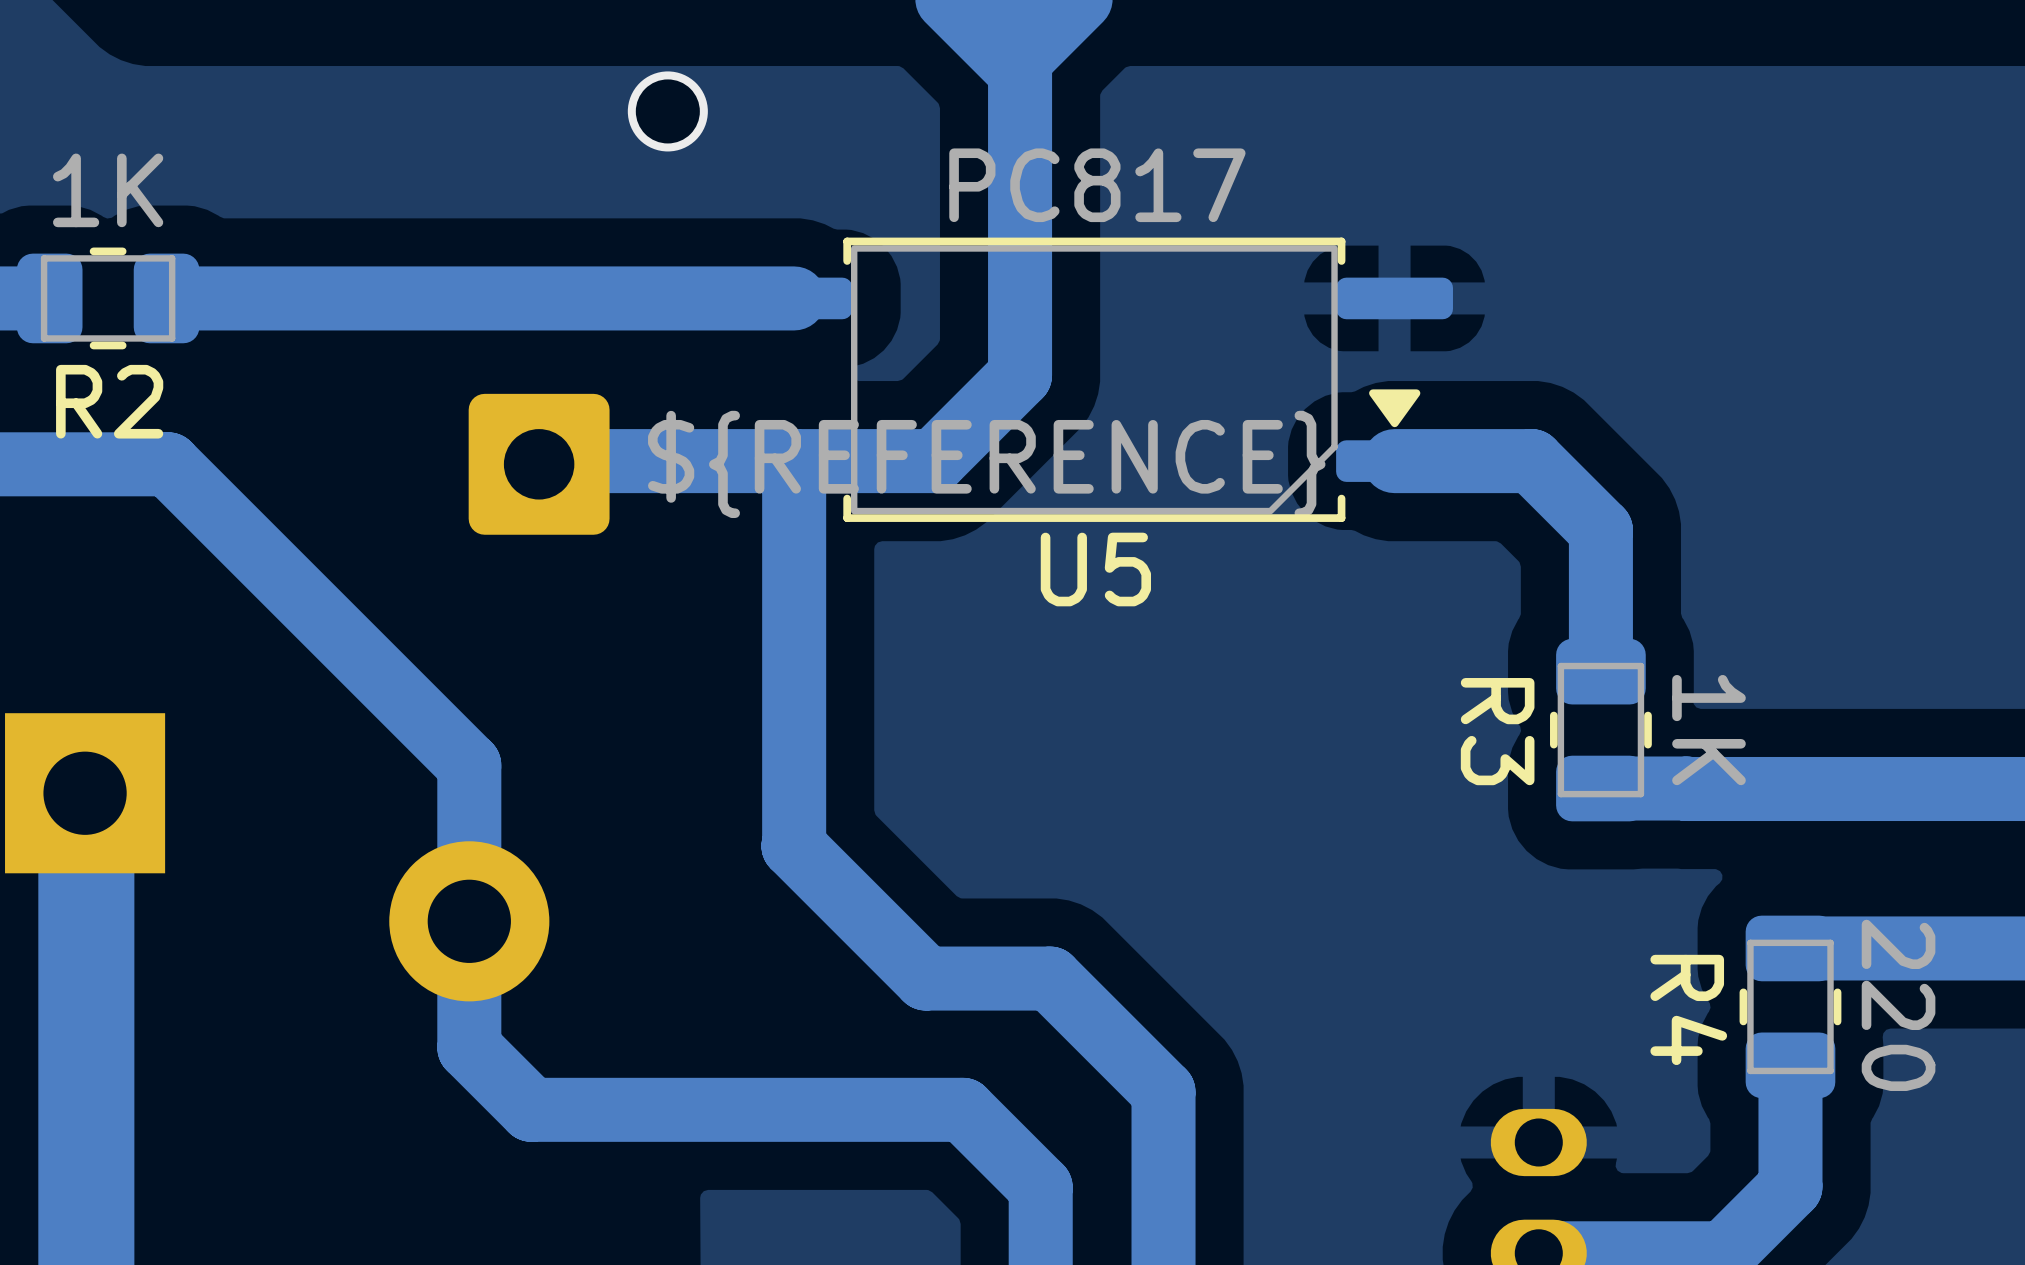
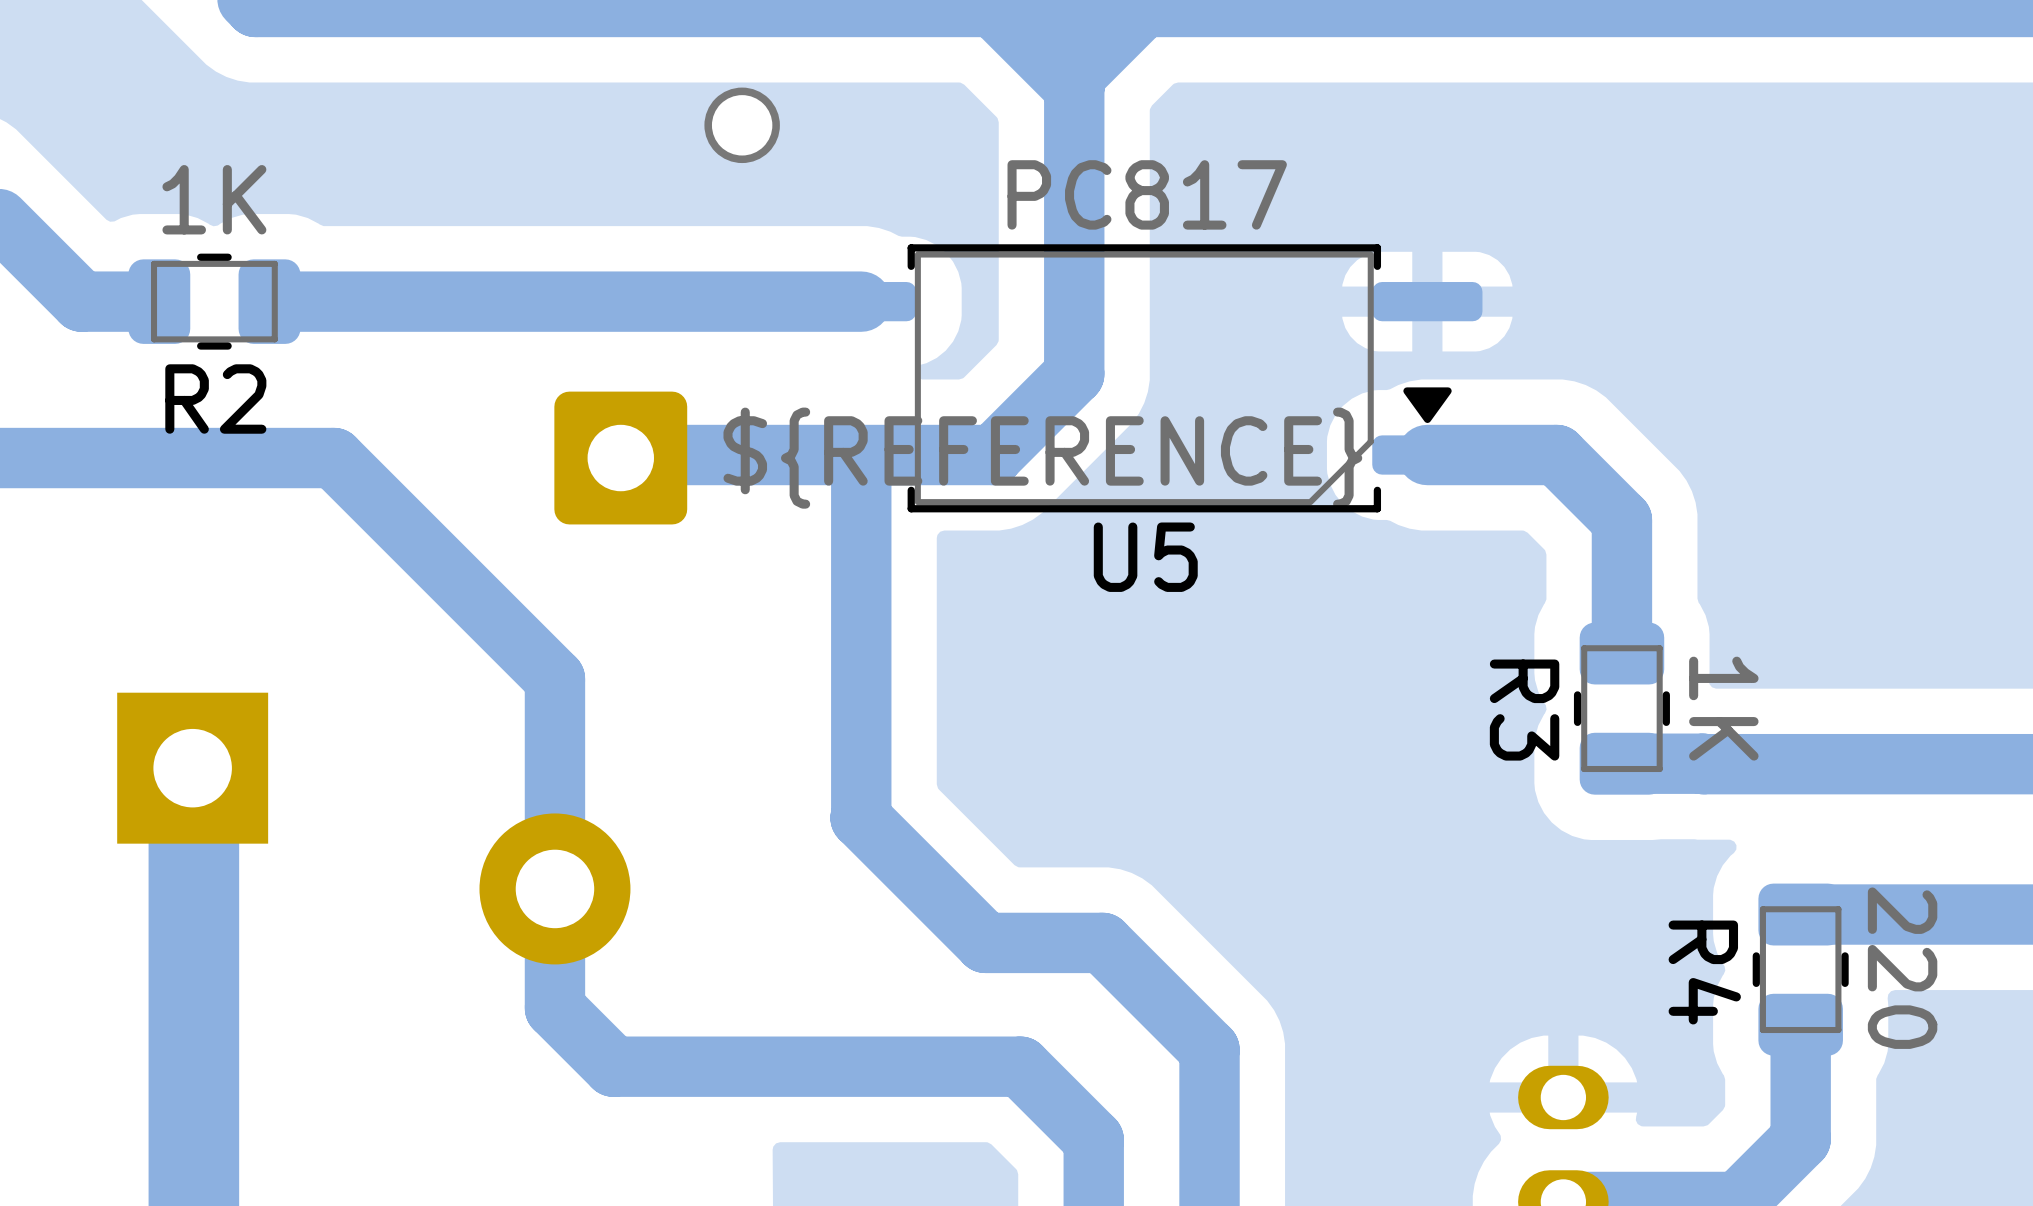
track: (168, 464) (469, 765) -> (271, 458) (333, 458) (554, 679) (554, 741)

